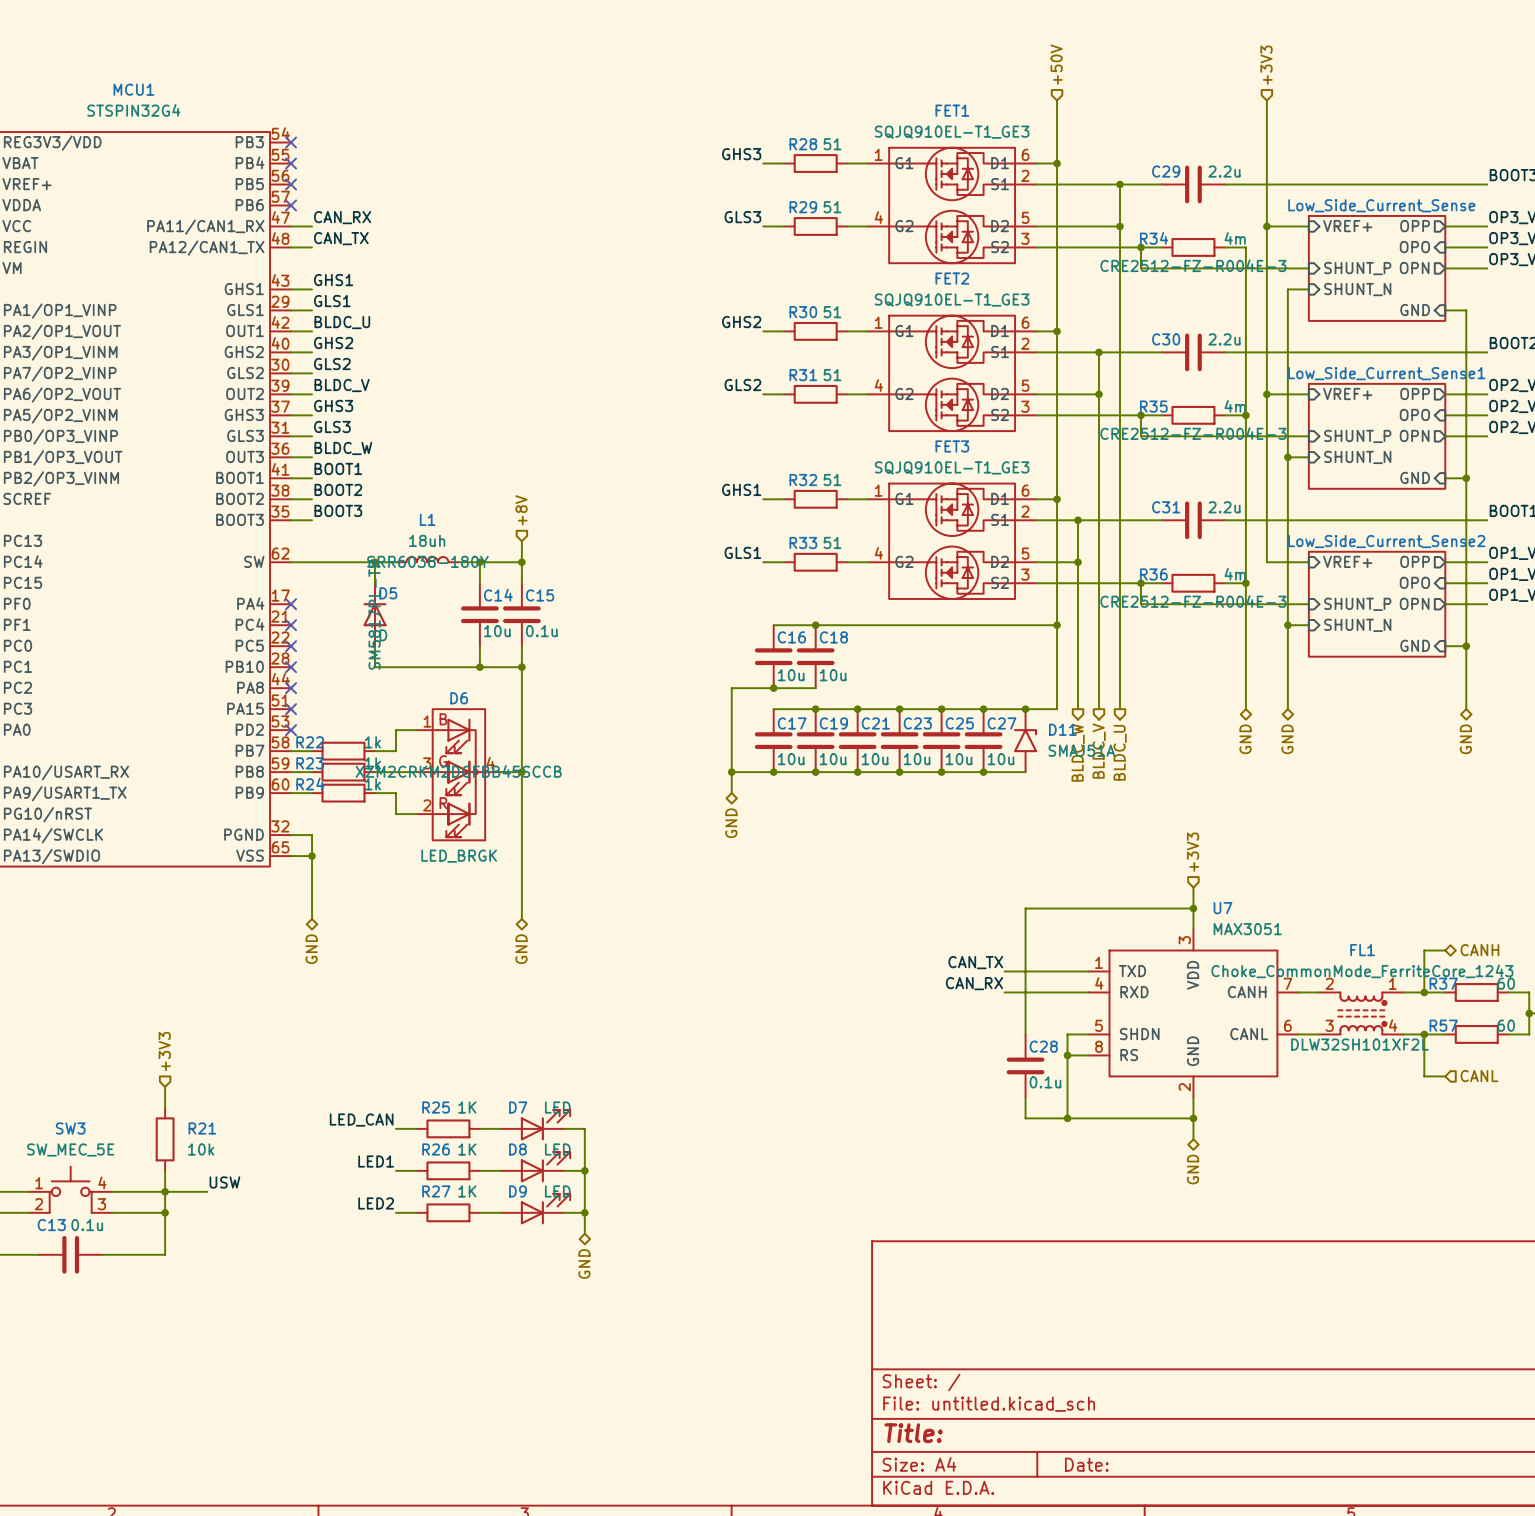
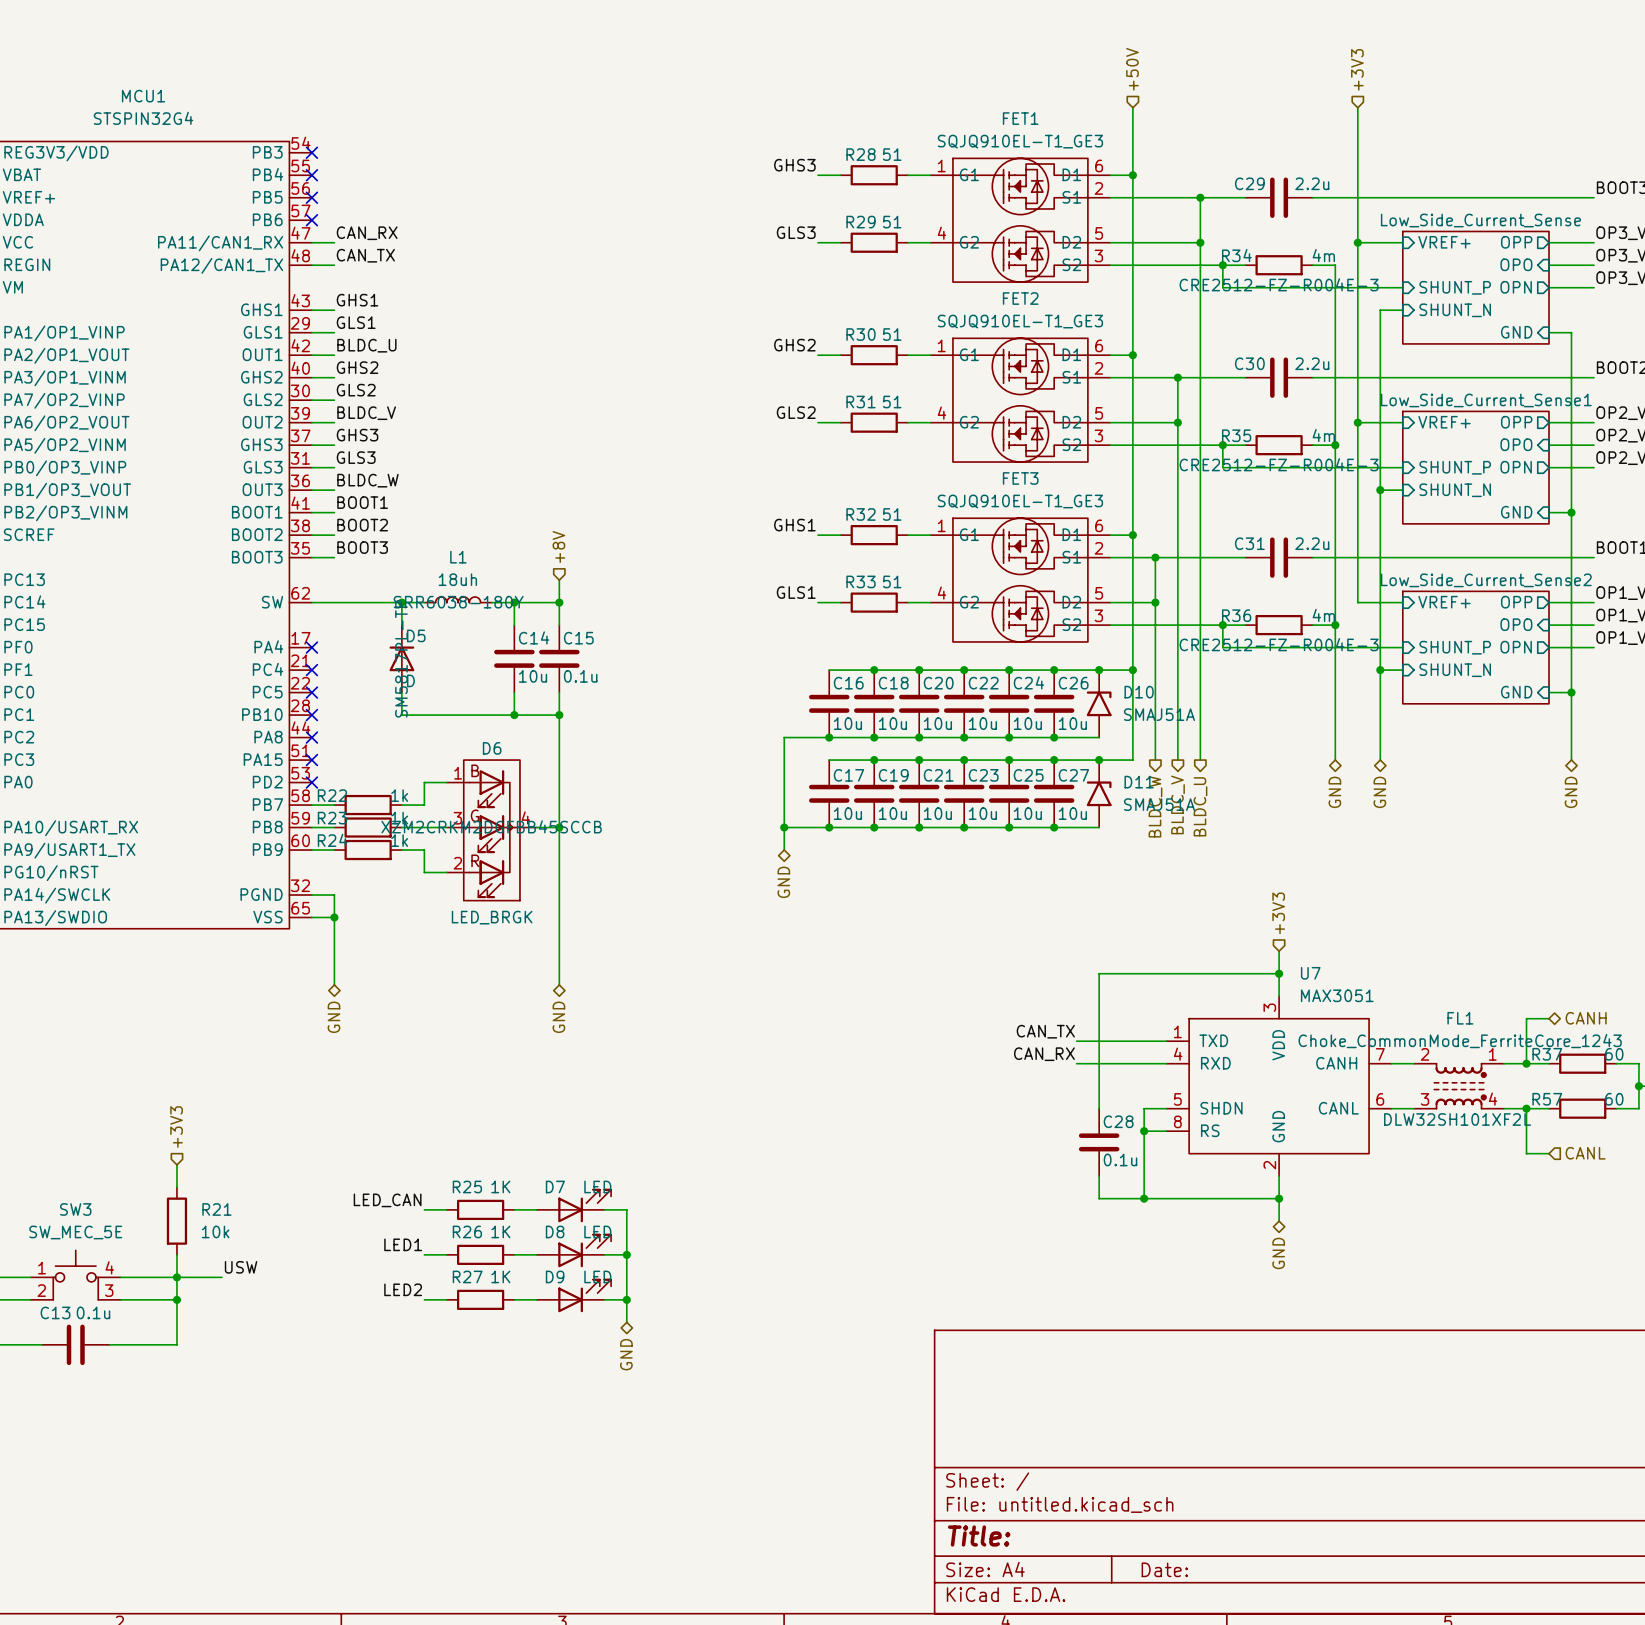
junction: none -> (919, 670)
junction: none -> (964, 670)
junction: none -> (1009, 670)
junction: none -> (1054, 670)
junction: none -> (1099, 670)
C20: none -> 10u (919, 703)
C22: none -> 10u (964, 703)
C24: none -> 10u (1009, 703)
C26: none -> 10u (1054, 703)
D10: none -> SMAJ51A (1099, 703)
wire: none -> (874, 737) (1099, 737)
junction: none -> (874, 737)
junction: none -> (919, 737)
junction: none -> (964, 737)
junction: none -> (1009, 737)
junction: none -> (1054, 737)

